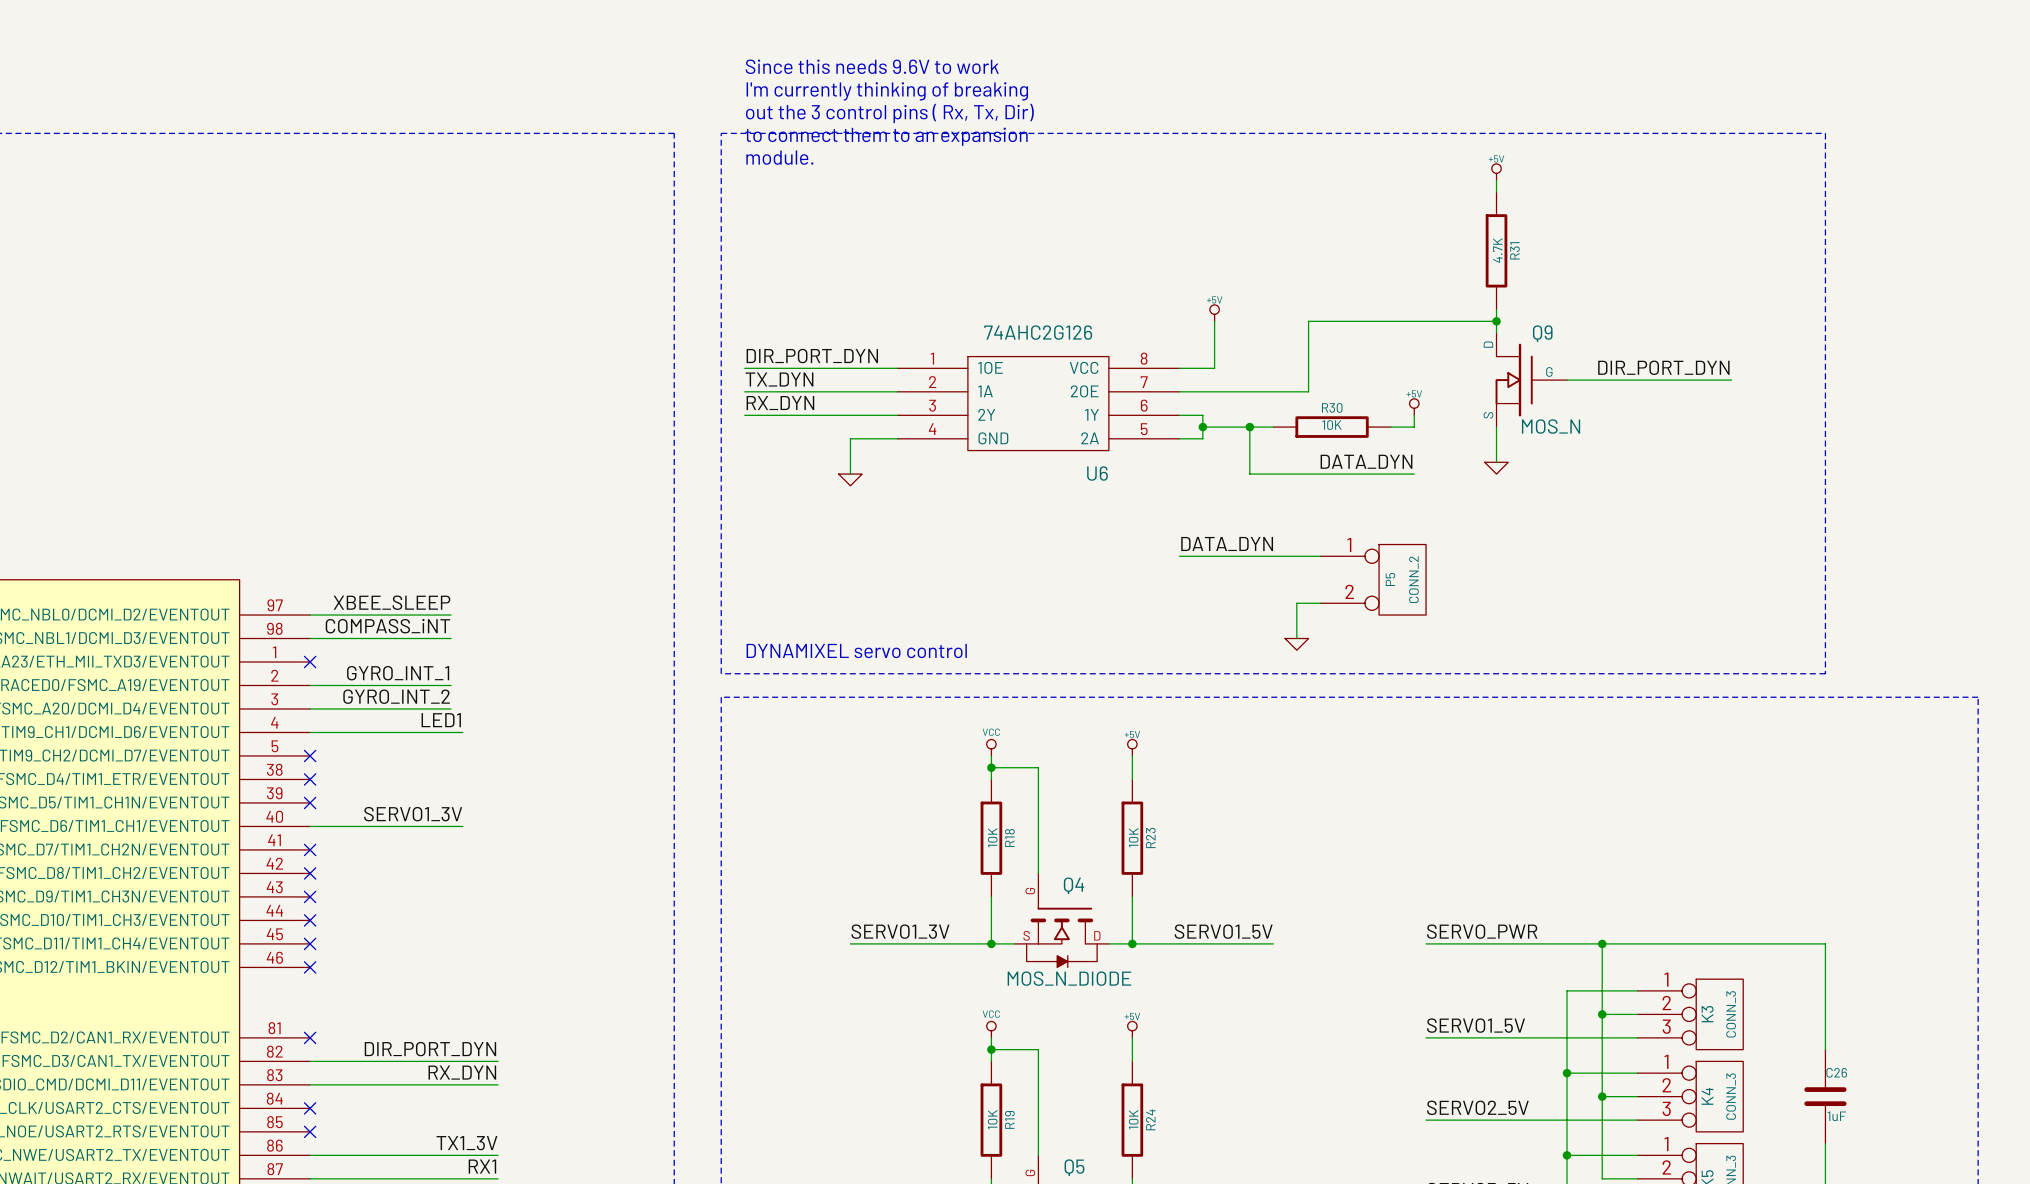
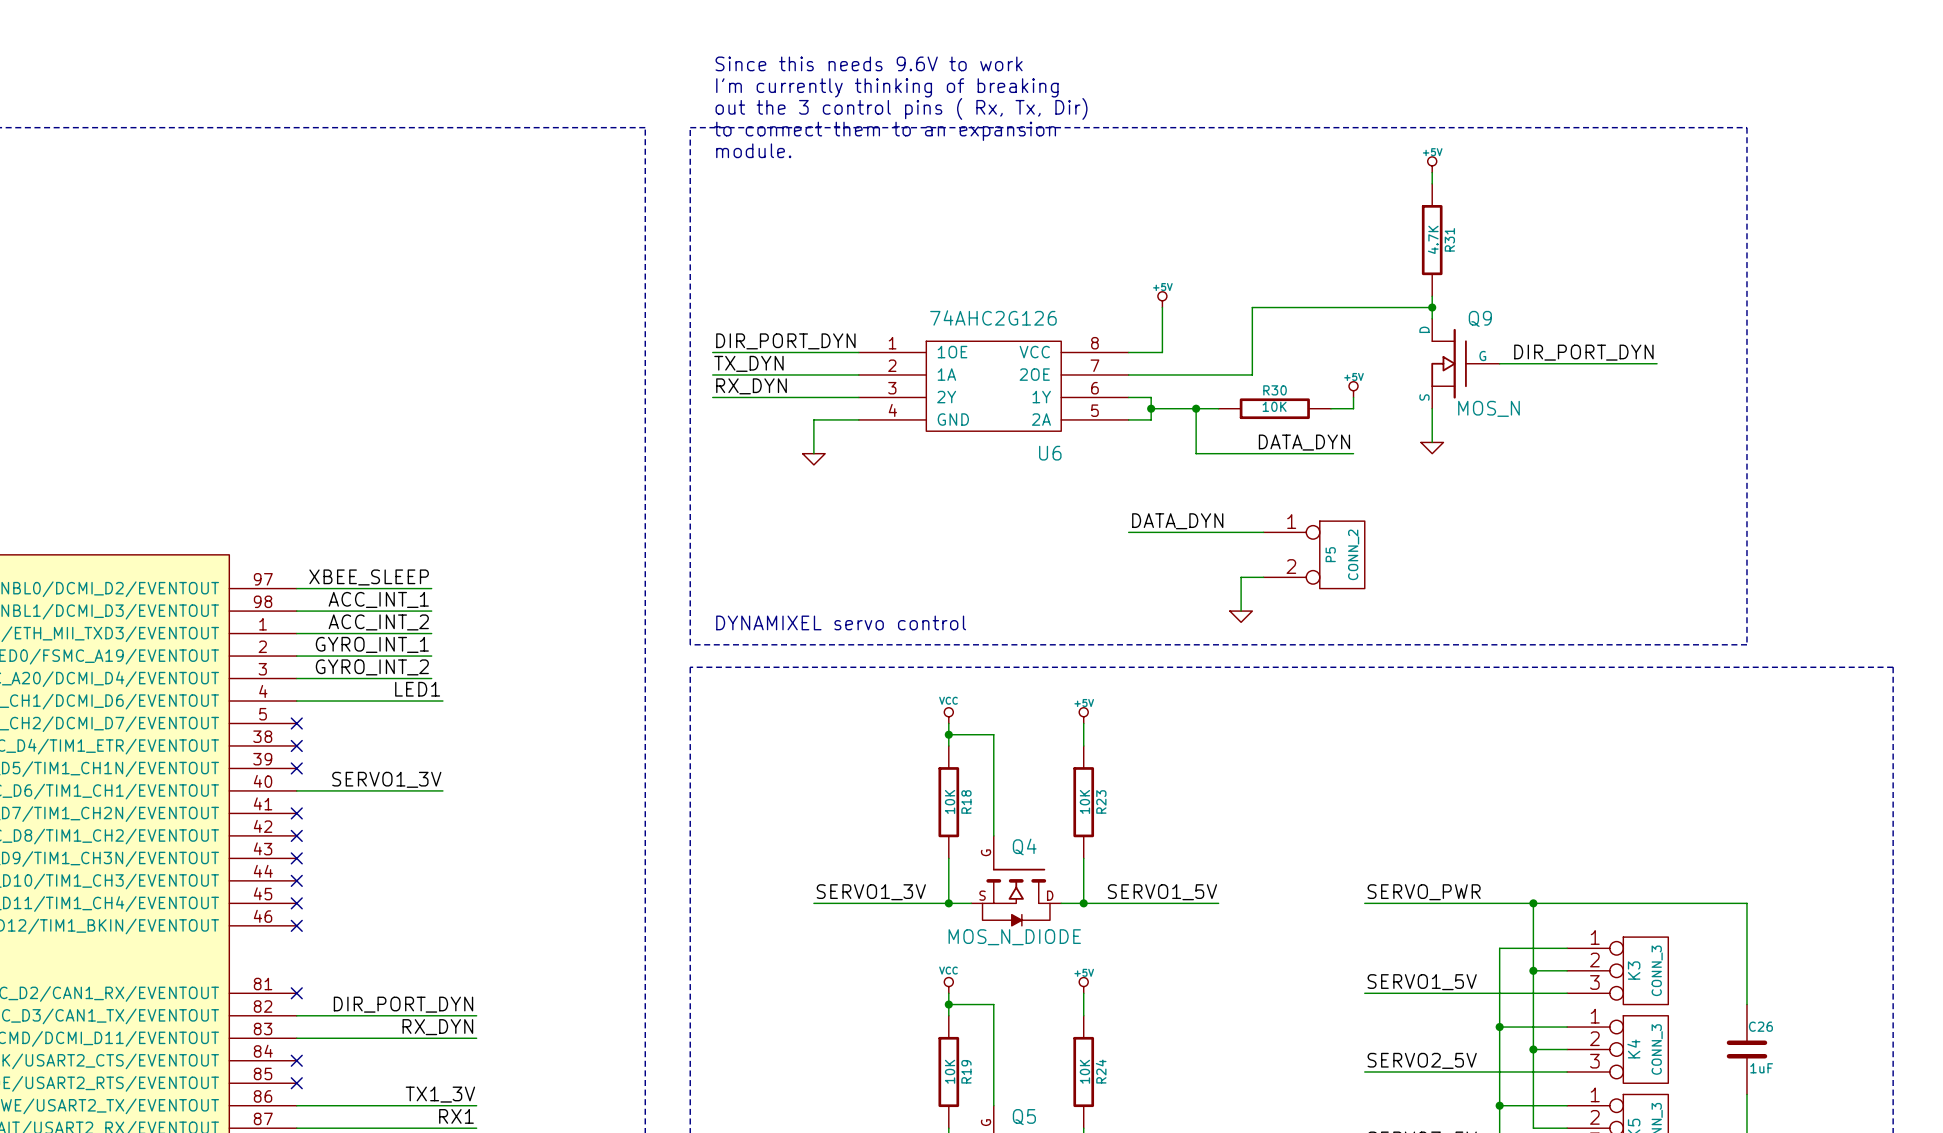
label: COMPASS_iNT (387, 626) -> ACC_INT_1 (378, 599)
label: none -> ACC_INT_2 (378, 622)
wire: none -> (296, 633) (431, 633)
no-connect mark: (310, 662) -> none

